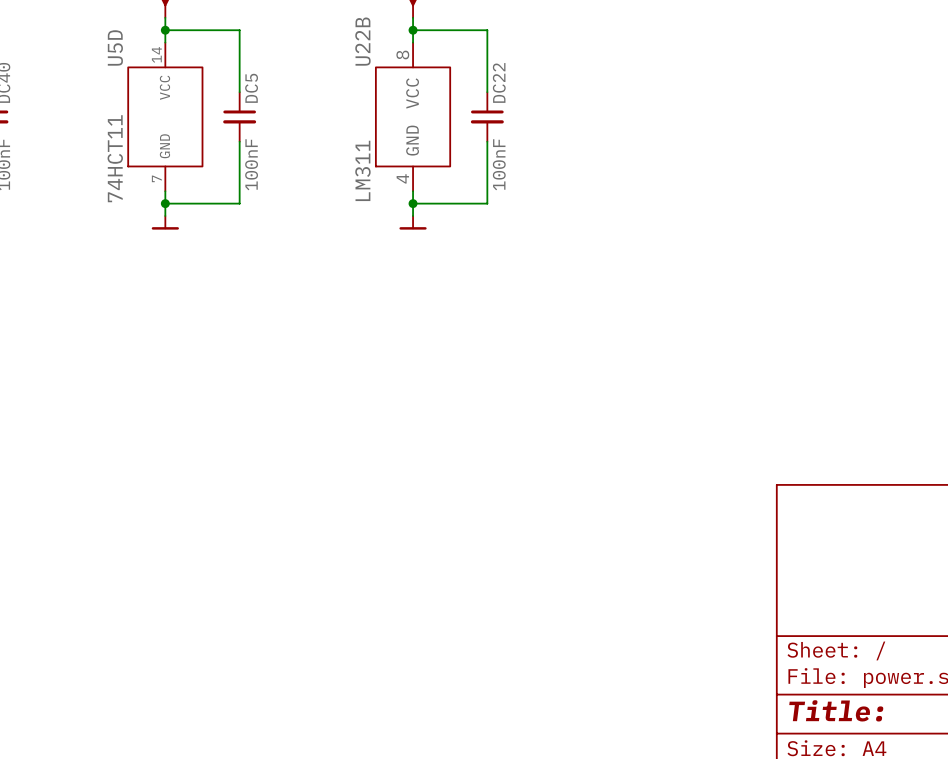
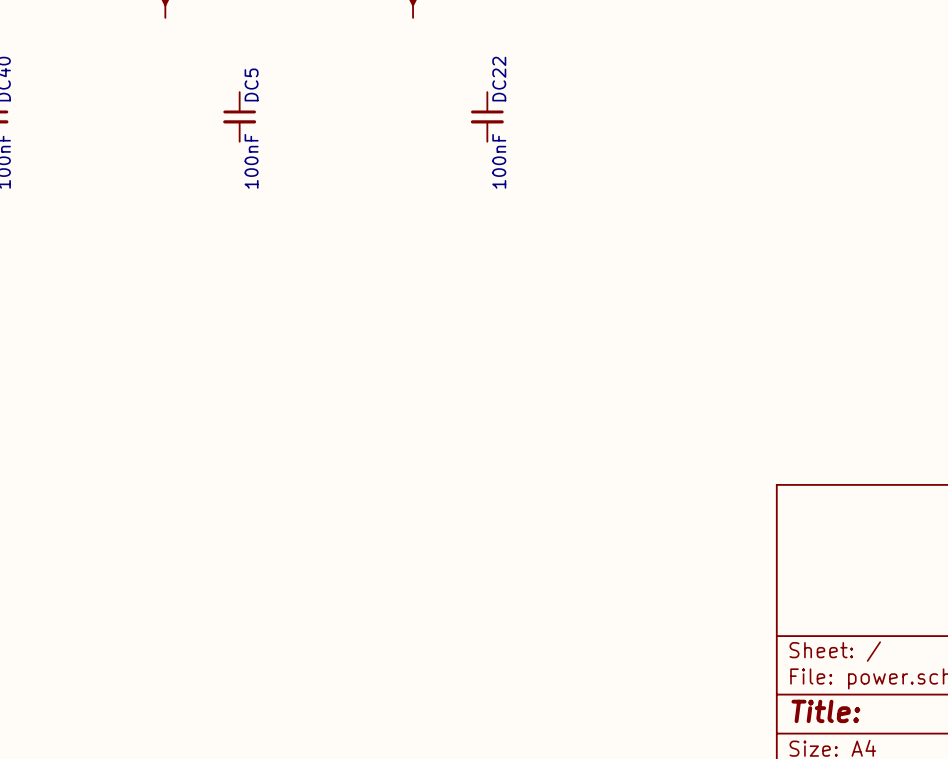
wire: (165, 17) (165, 42) -> none
wire: (413, 17) (413, 42) -> none
wire: (165, 30) (239, 30) (239, 92) -> none
junction: (165, 30) -> none
wire: (413, 30) (487, 30) (487, 92) -> none
junction: (413, 30) -> none
U5D: 74HCT11 (165, 116) -> none
U22B: LM311 (413, 116) -> none
wire: (239, 141) (239, 203) (165, 203) -> none
wire: (487, 141) (487, 203) (413, 203) -> none
wire: (165, 191) (165, 216) -> none
wire: (413, 191) (413, 216) -> none
junction: (165, 203) -> none
junction: (413, 203) -> none
power symbol: (165, 222) -> none
power symbol: (413, 222) -> none

